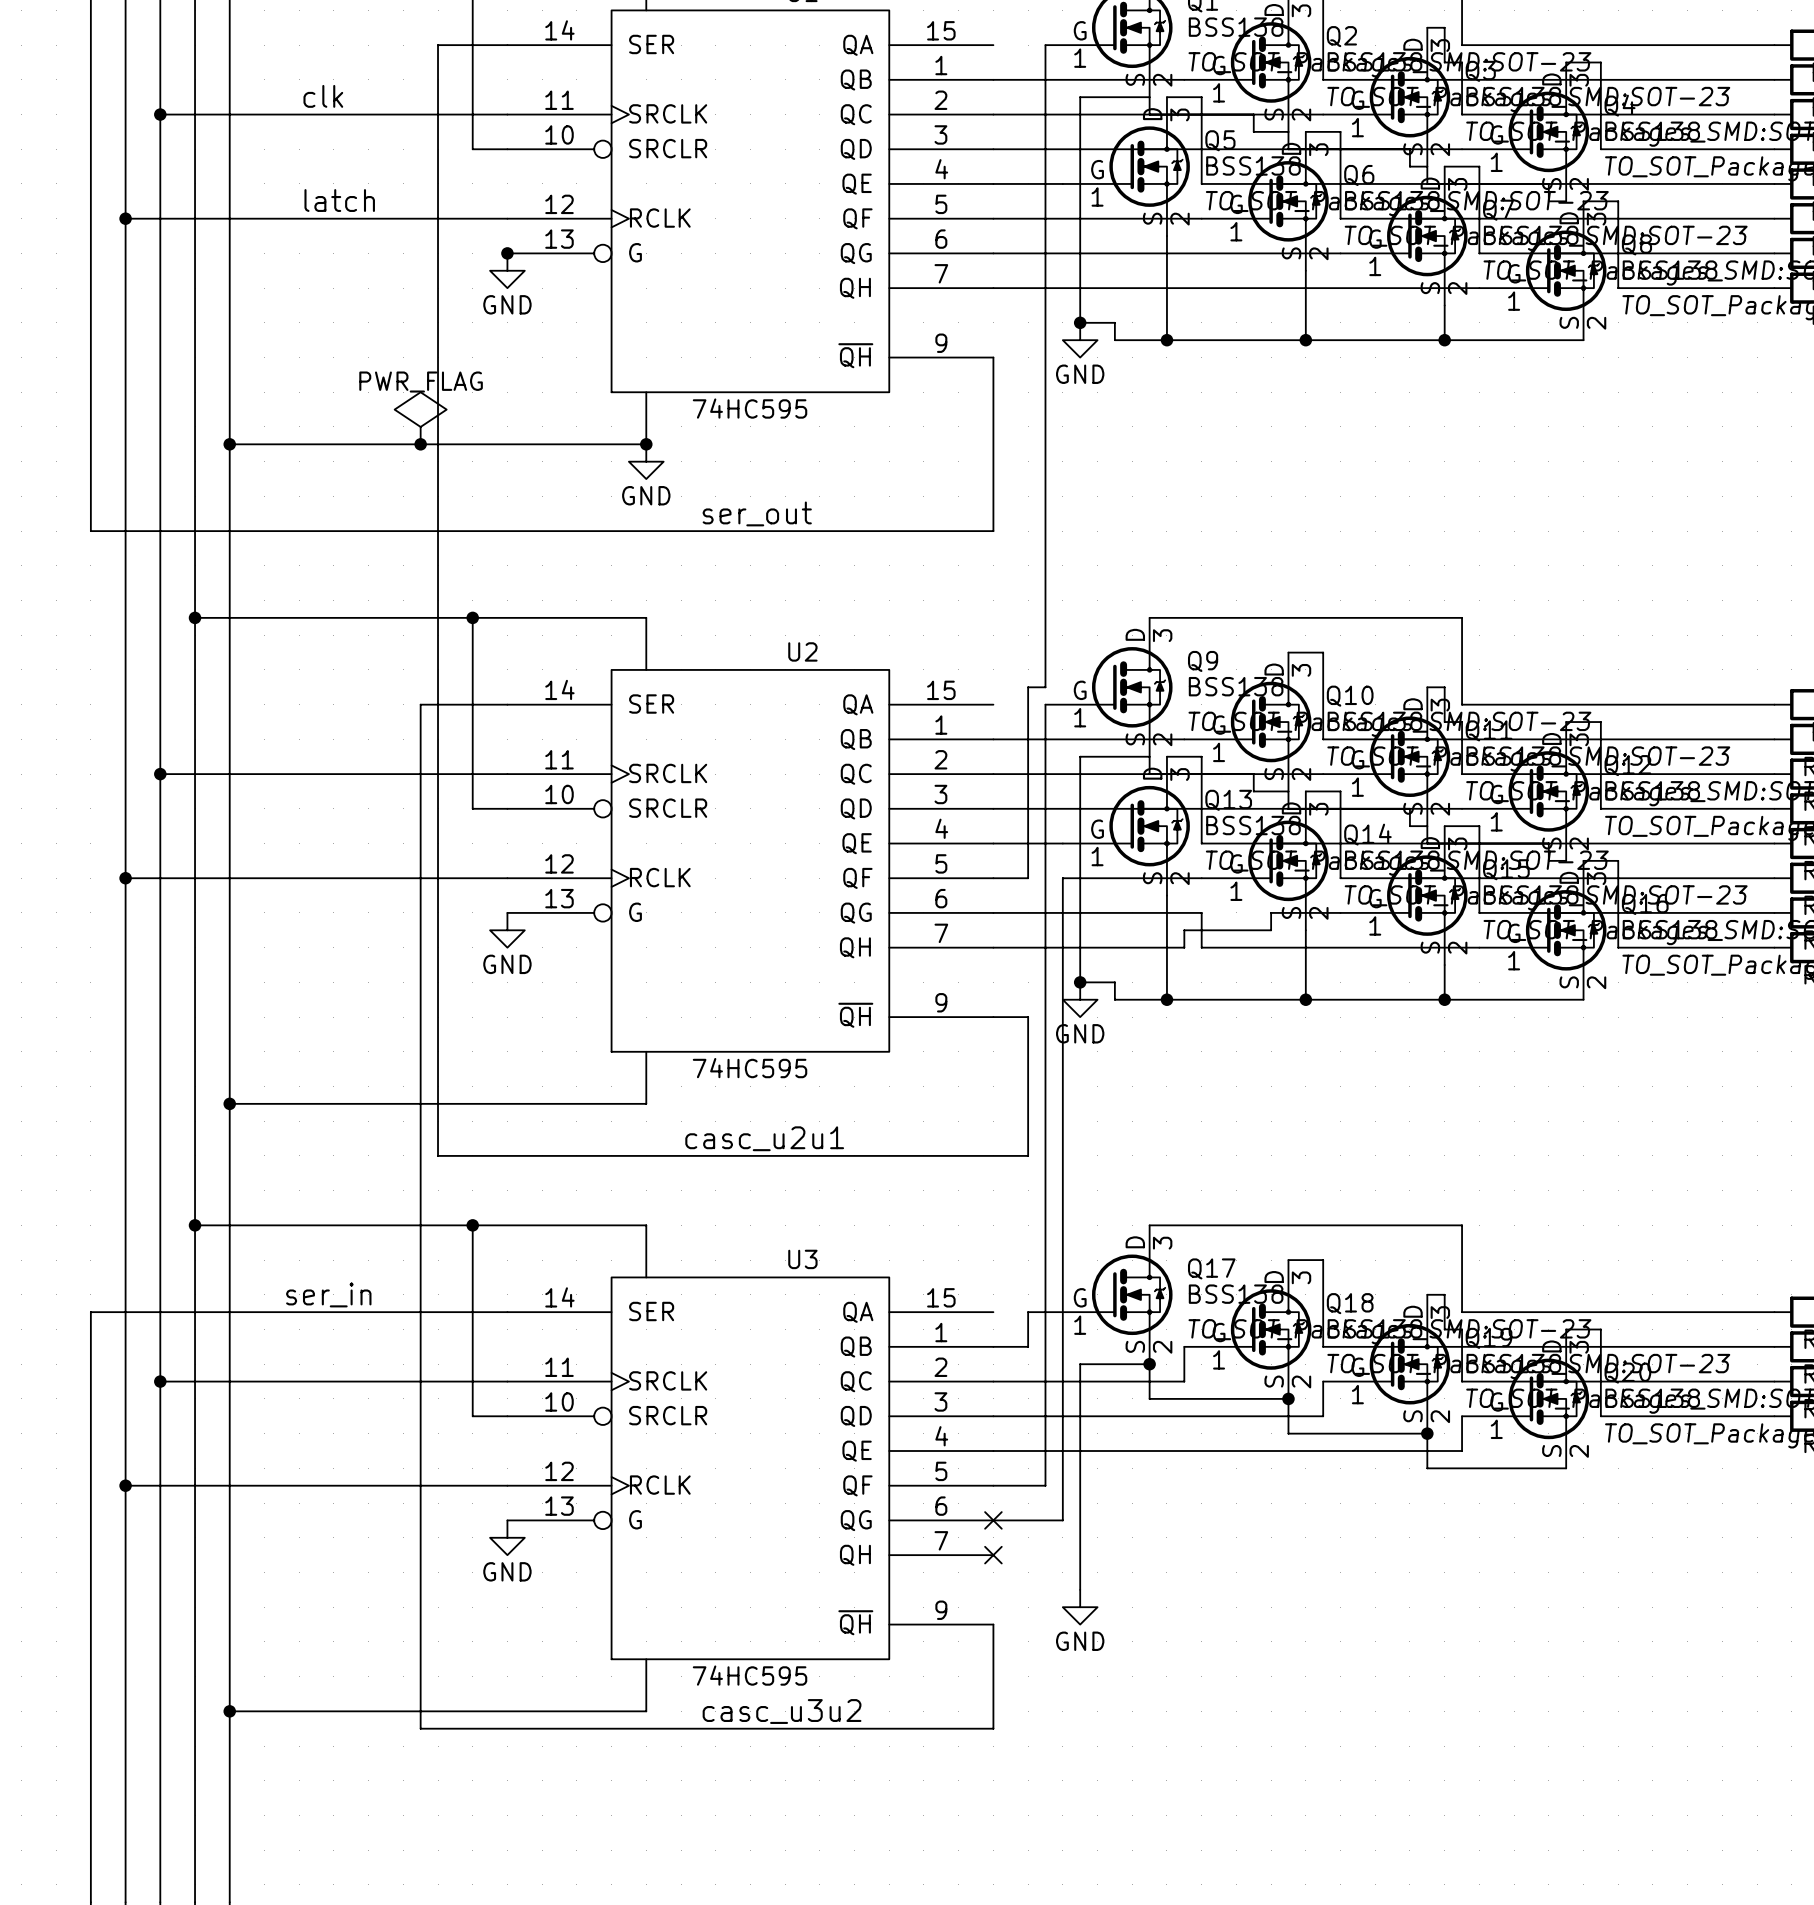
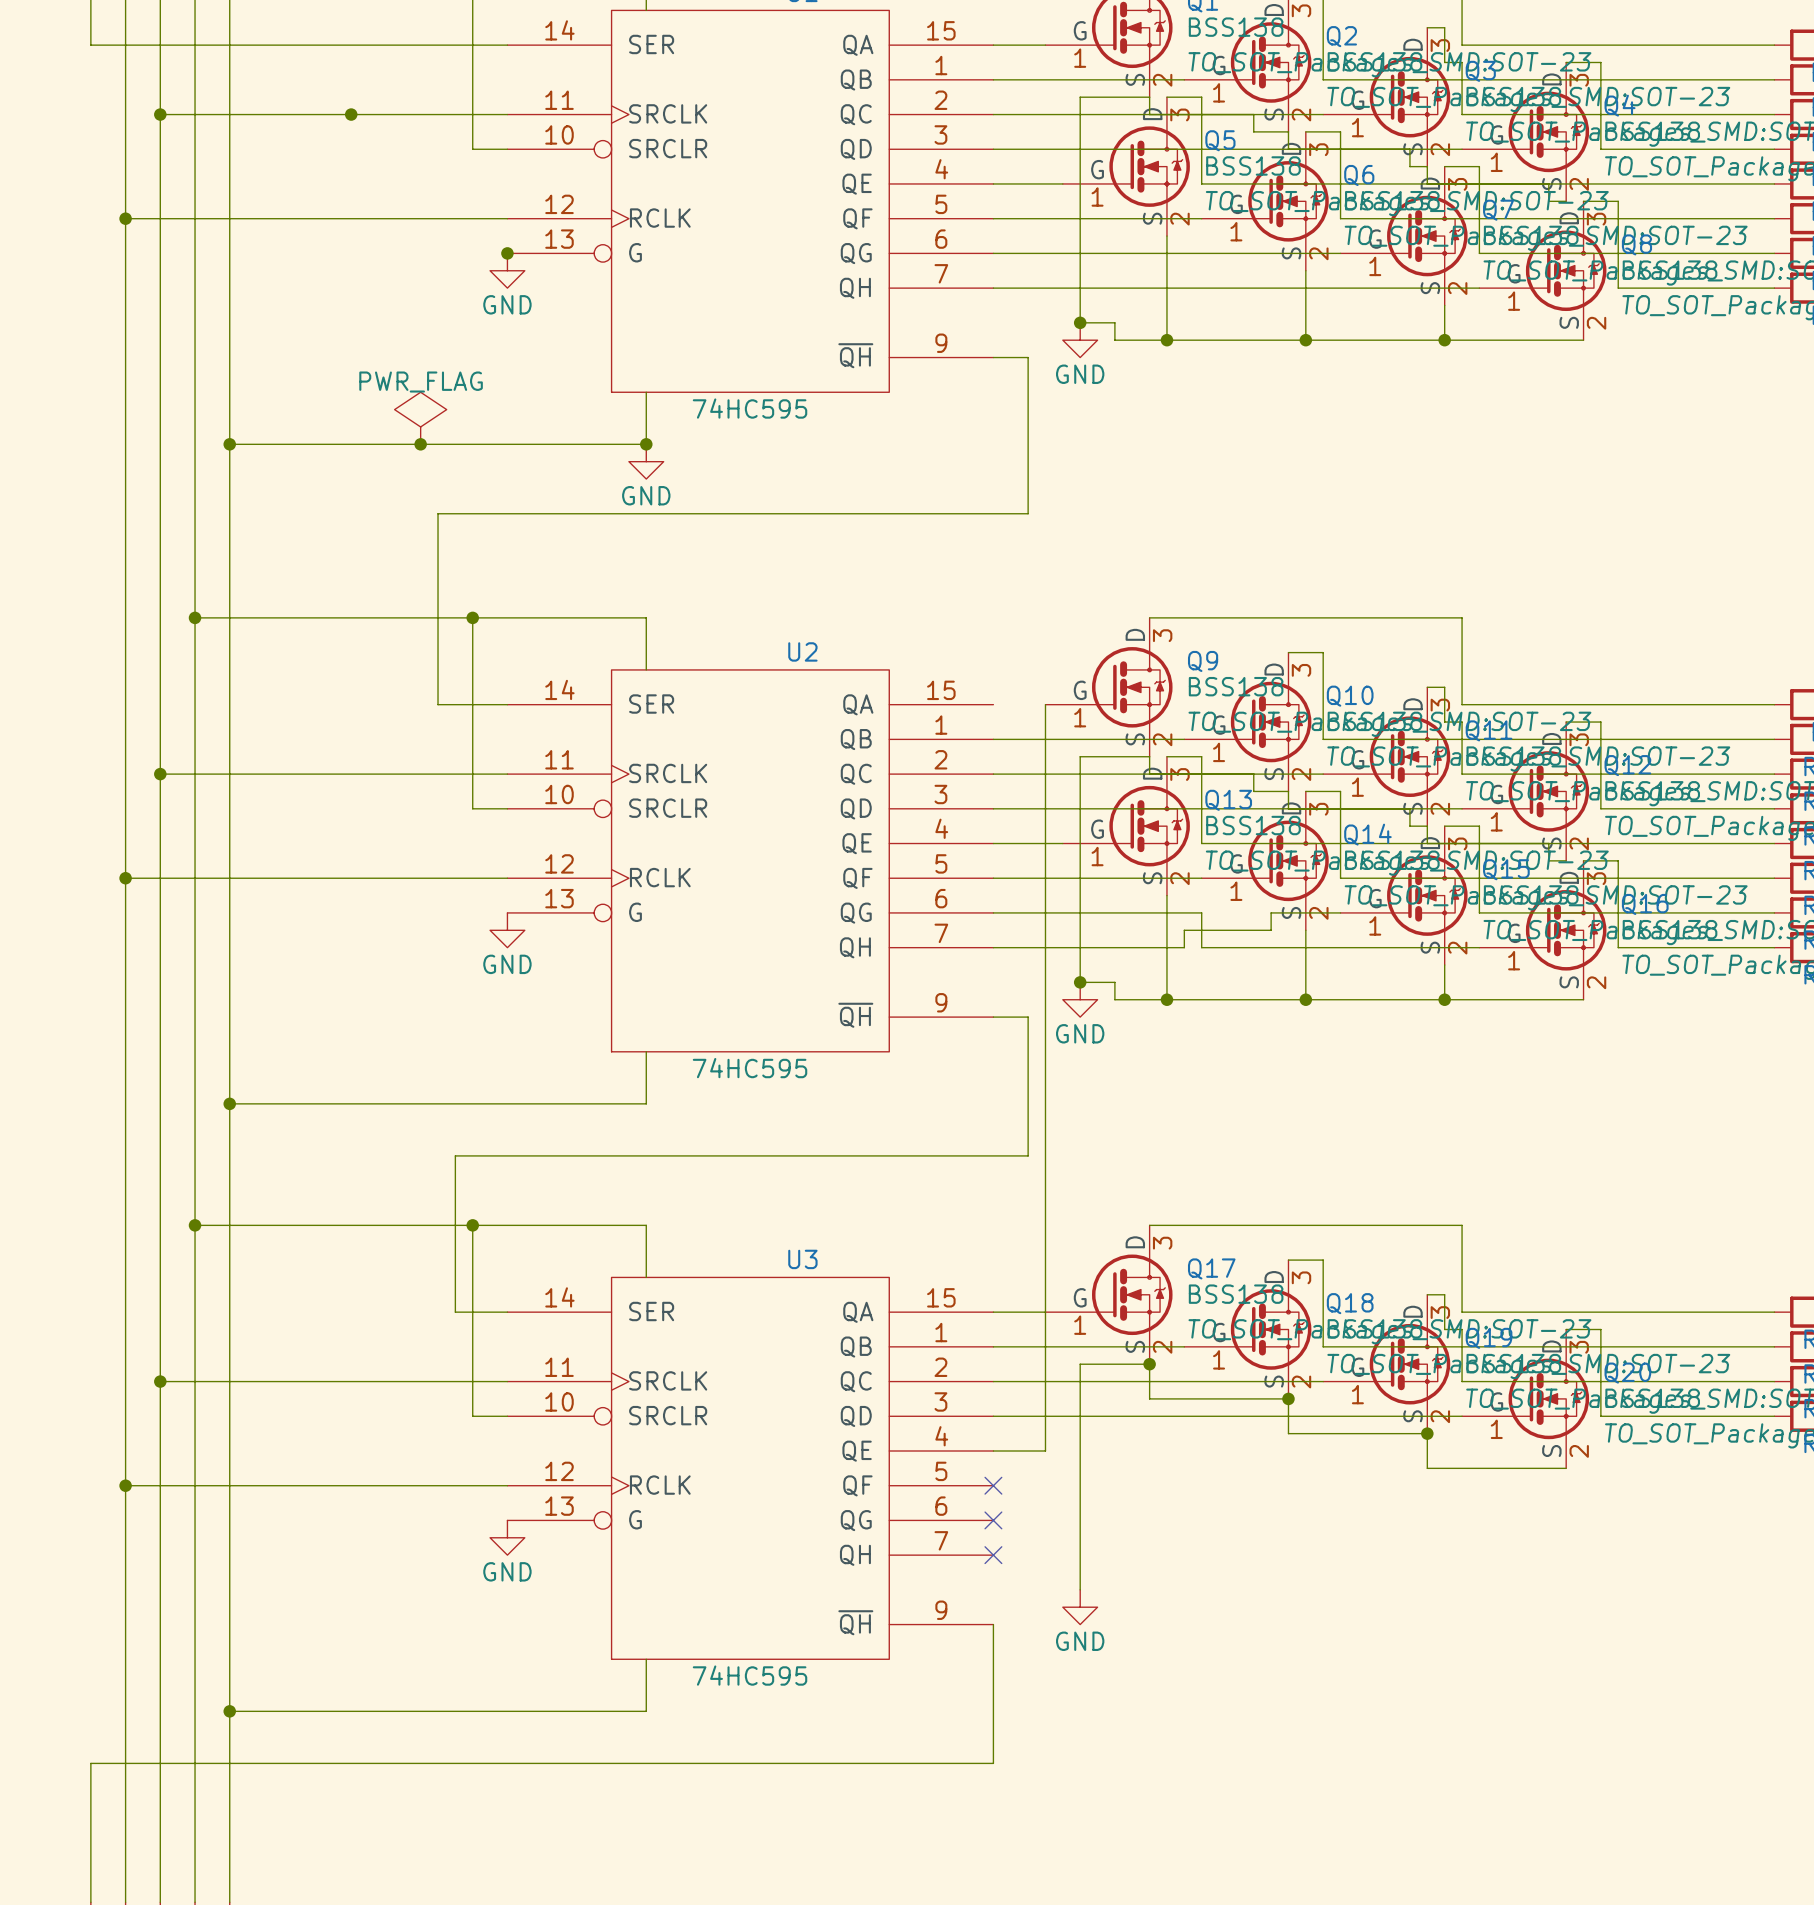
wire: (90, 45) (90, 531) (993, 531) (993, 357) -> (438, 513) (1028, 513) (1028, 357) (993, 357)
wire: (438, 45) (438, 513) -> (438, 45) (90, 45)
wire: (1045, 45) (1045, 687) (1028, 687) (1028, 878) -> (1045, 45) (993, 45)
label: clk (323, 96) -> none
junction: none -> (351, 114)
label: latch (339, 200) -> none
label: ser_out (757, 513) -> none
wire: (1062, 878) (1062, 1520) (993, 1520) -> (1062, 878) (1028, 878)
label: casc_u2u1 (764, 1138) -> none
wire: (455, 1155) (438, 1155) (438, 704) (420, 704) (420, 1728) (993, 1728) -> (455, 1155) (455, 1312)
label: ser_in (328, 1294) -> none
wire: (455, 1312) (90, 1312) (90, 1763) -> (993, 1728) (993, 1763) (90, 1763)
wire: (1028, 1312) (1028, 1346) -> (1028, 1312) (993, 1312)
wire: none -> (1028, 1346) (1184, 1346)
wire: (1184, 1346) (1184, 1381) -> (1323, 1381) (1184, 1381)
wire: (1323, 1381) (1323, 1416) -> (1462, 1416) (1323, 1416)
wire: (1462, 1416) (1462, 1450) (1045, 1450) (1045, 1485) (993, 1485) -> none
no-connect mark: none -> (993, 1485)
label: casc_u3u2 (782, 1711) -> none

